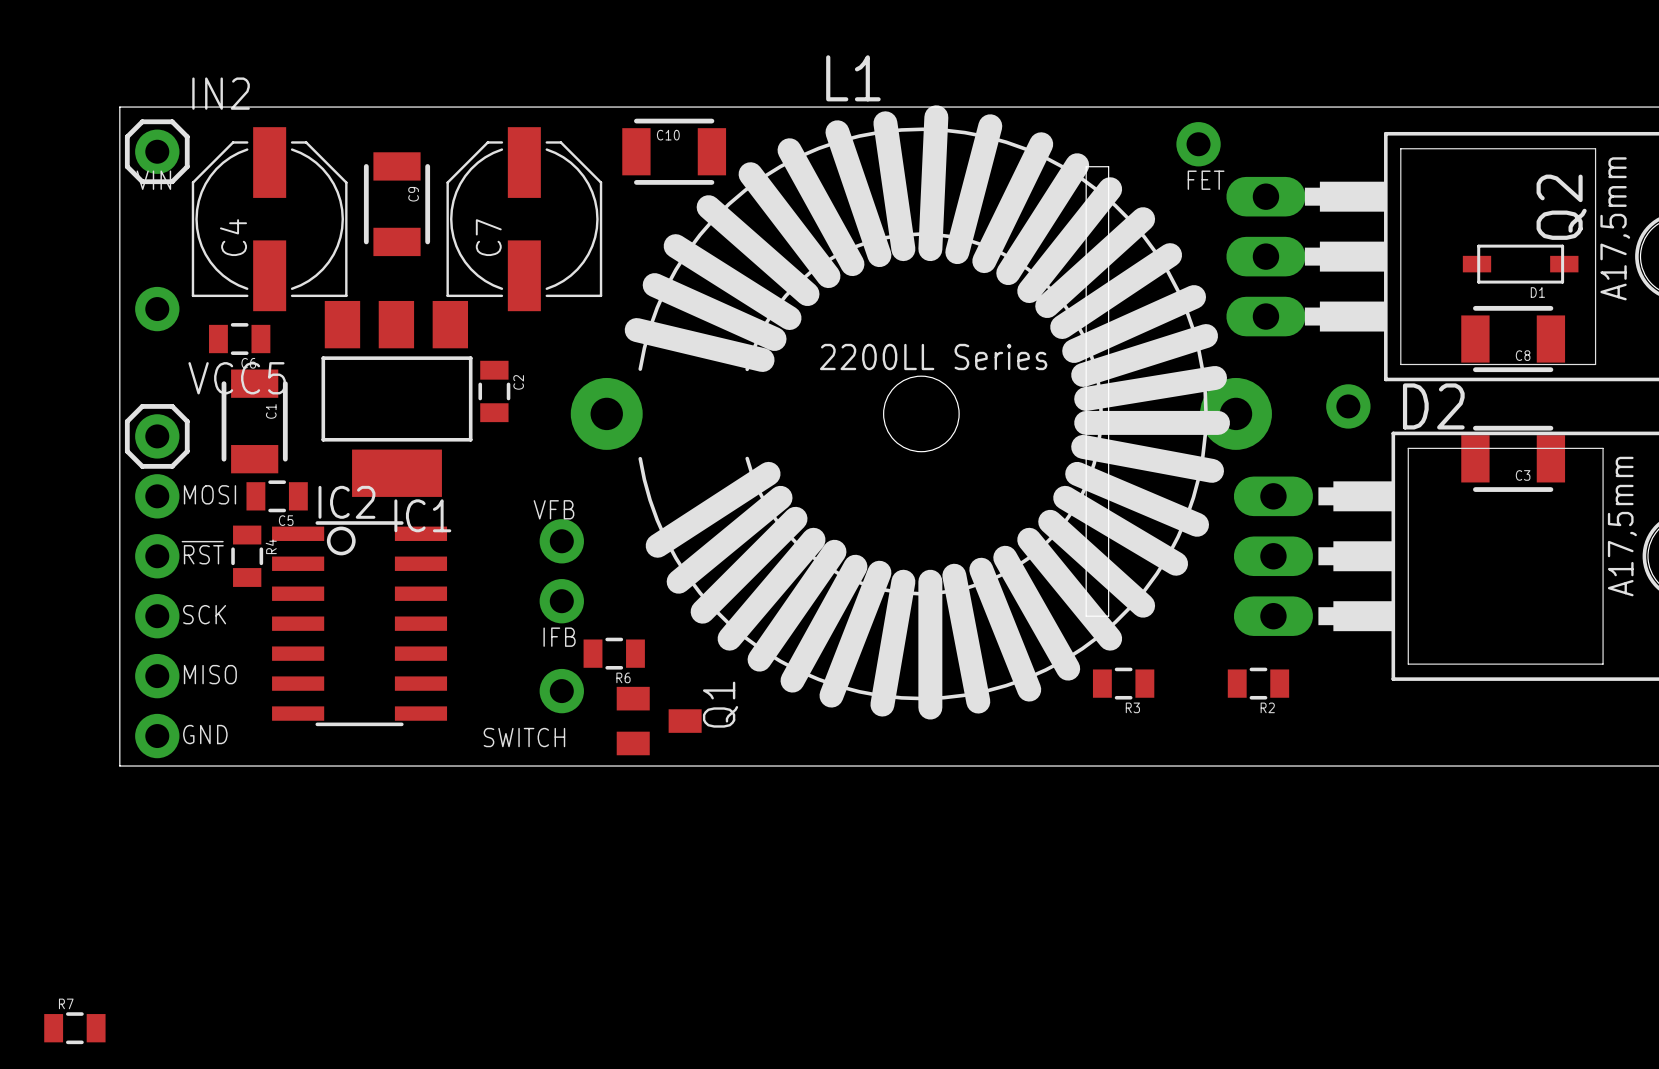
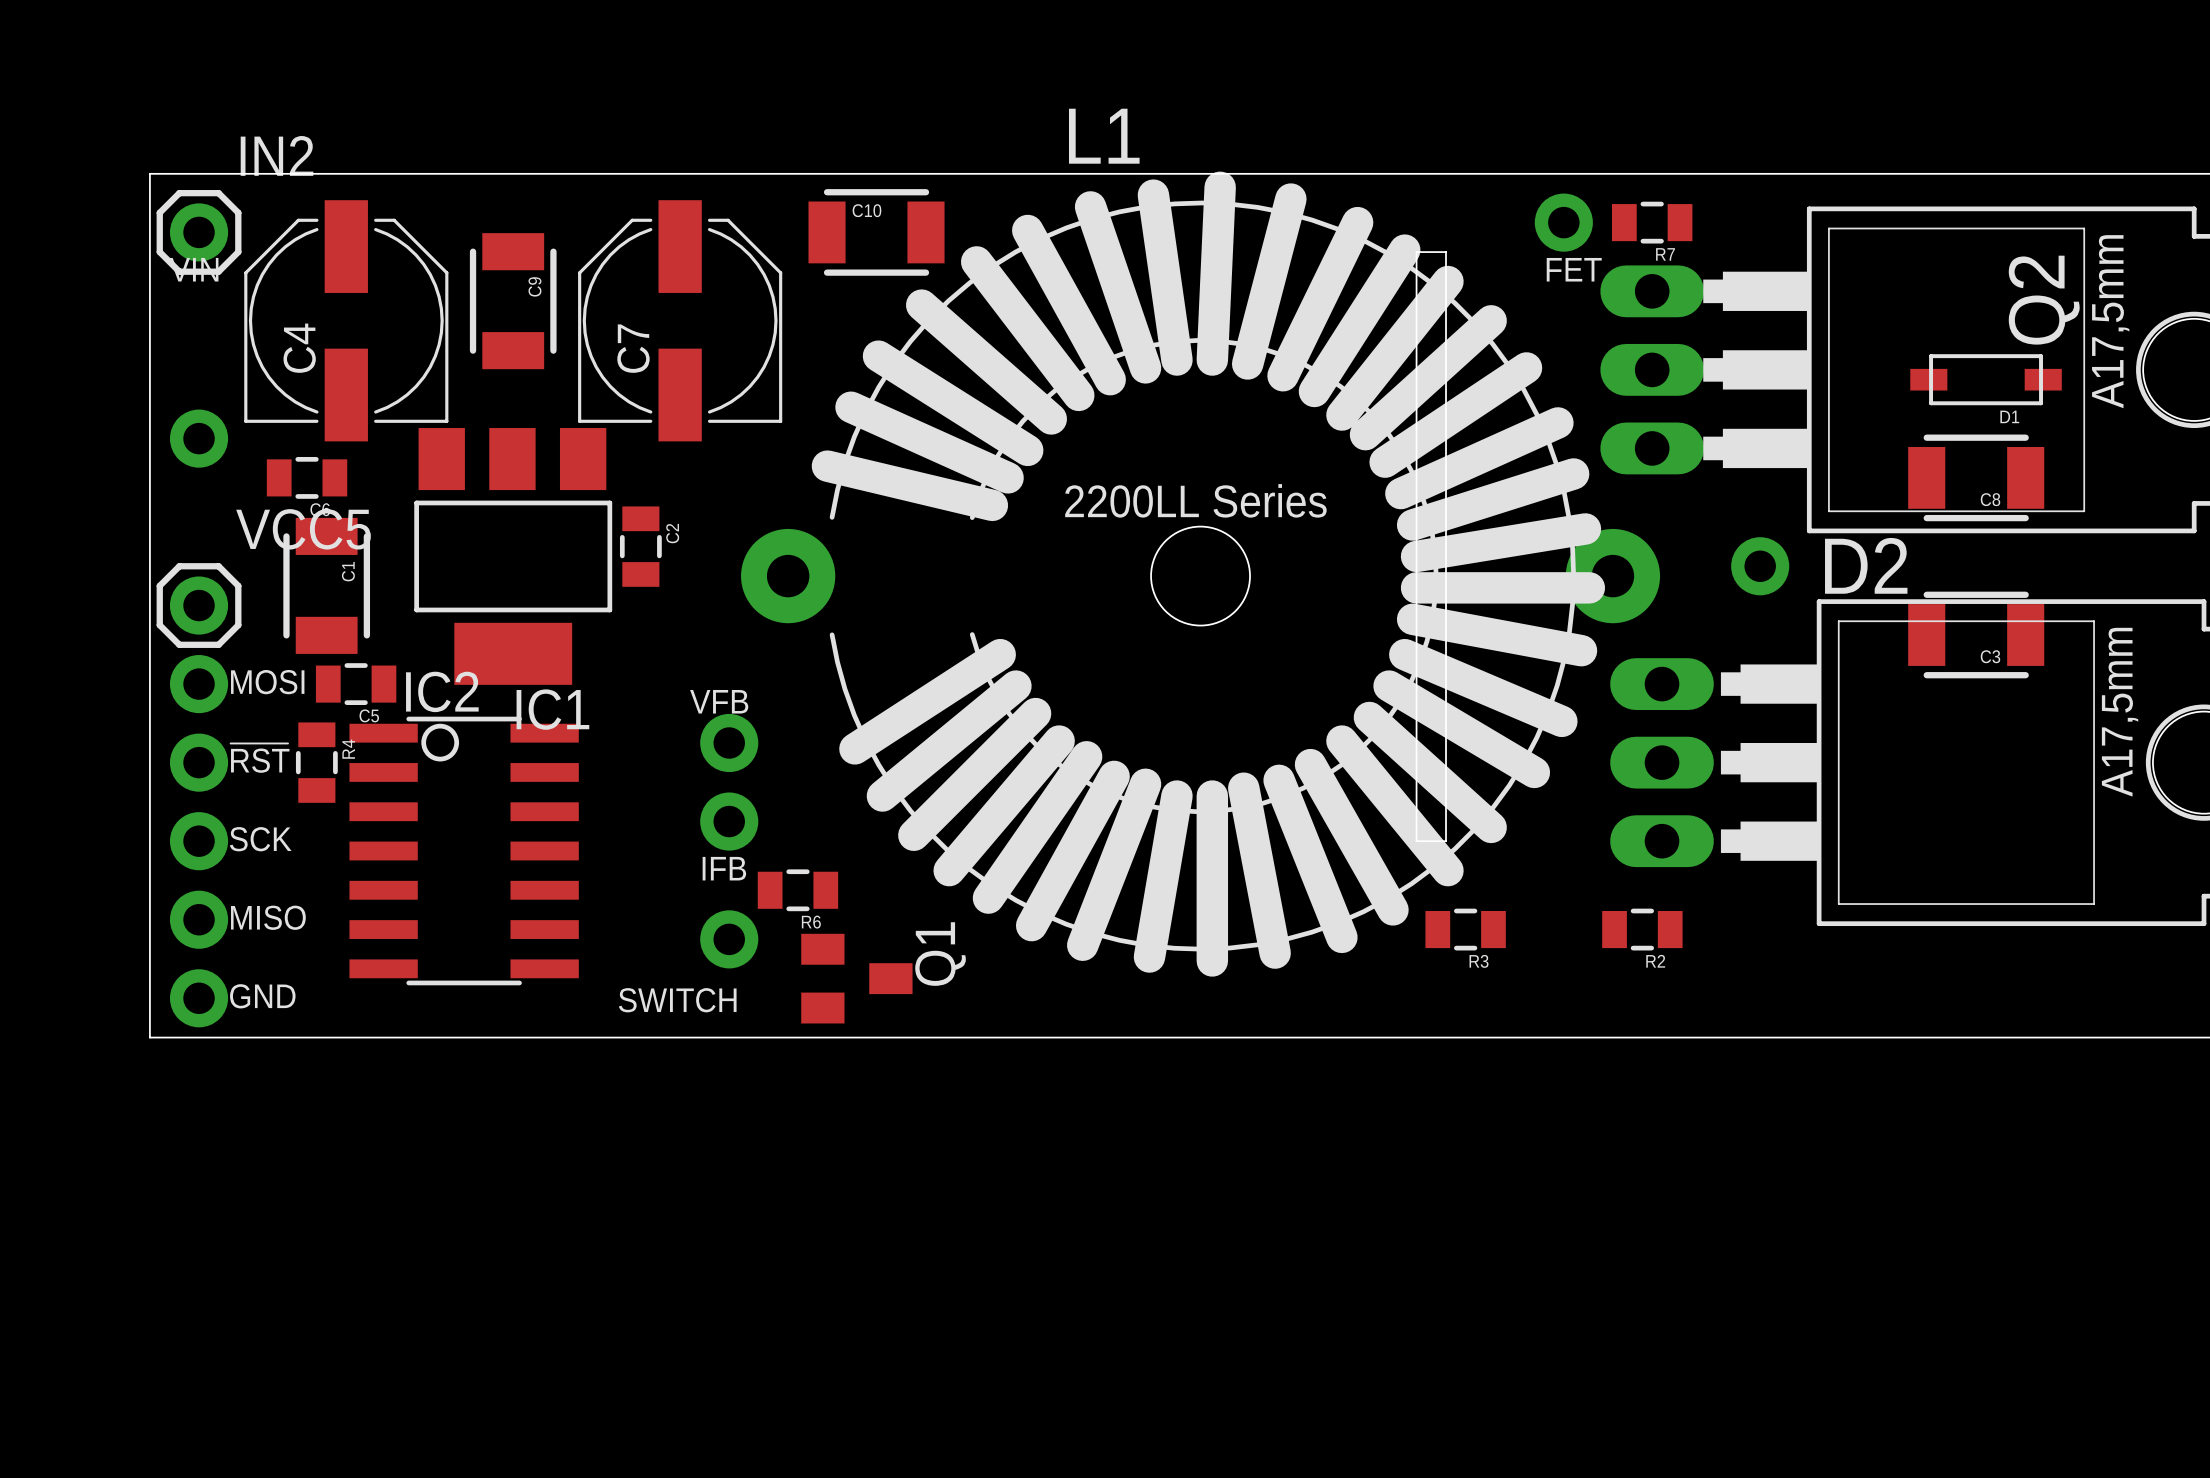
R7 name position: R7 (66, 1003) -> R7 (1665, 254)
R7 position: (74, 1028) -> (1652, 222)

